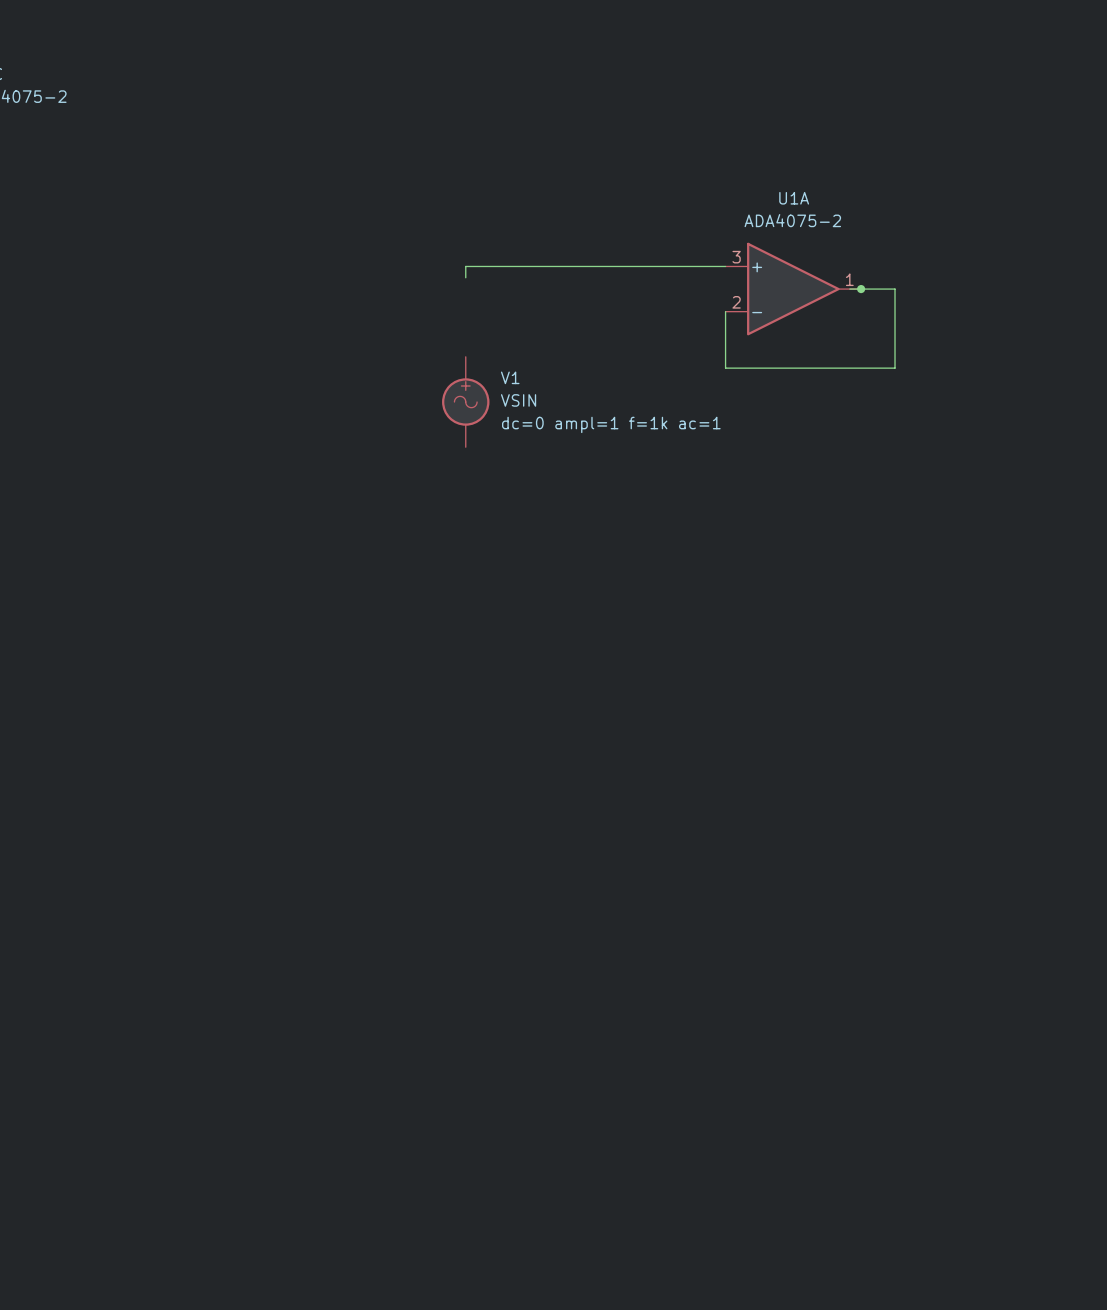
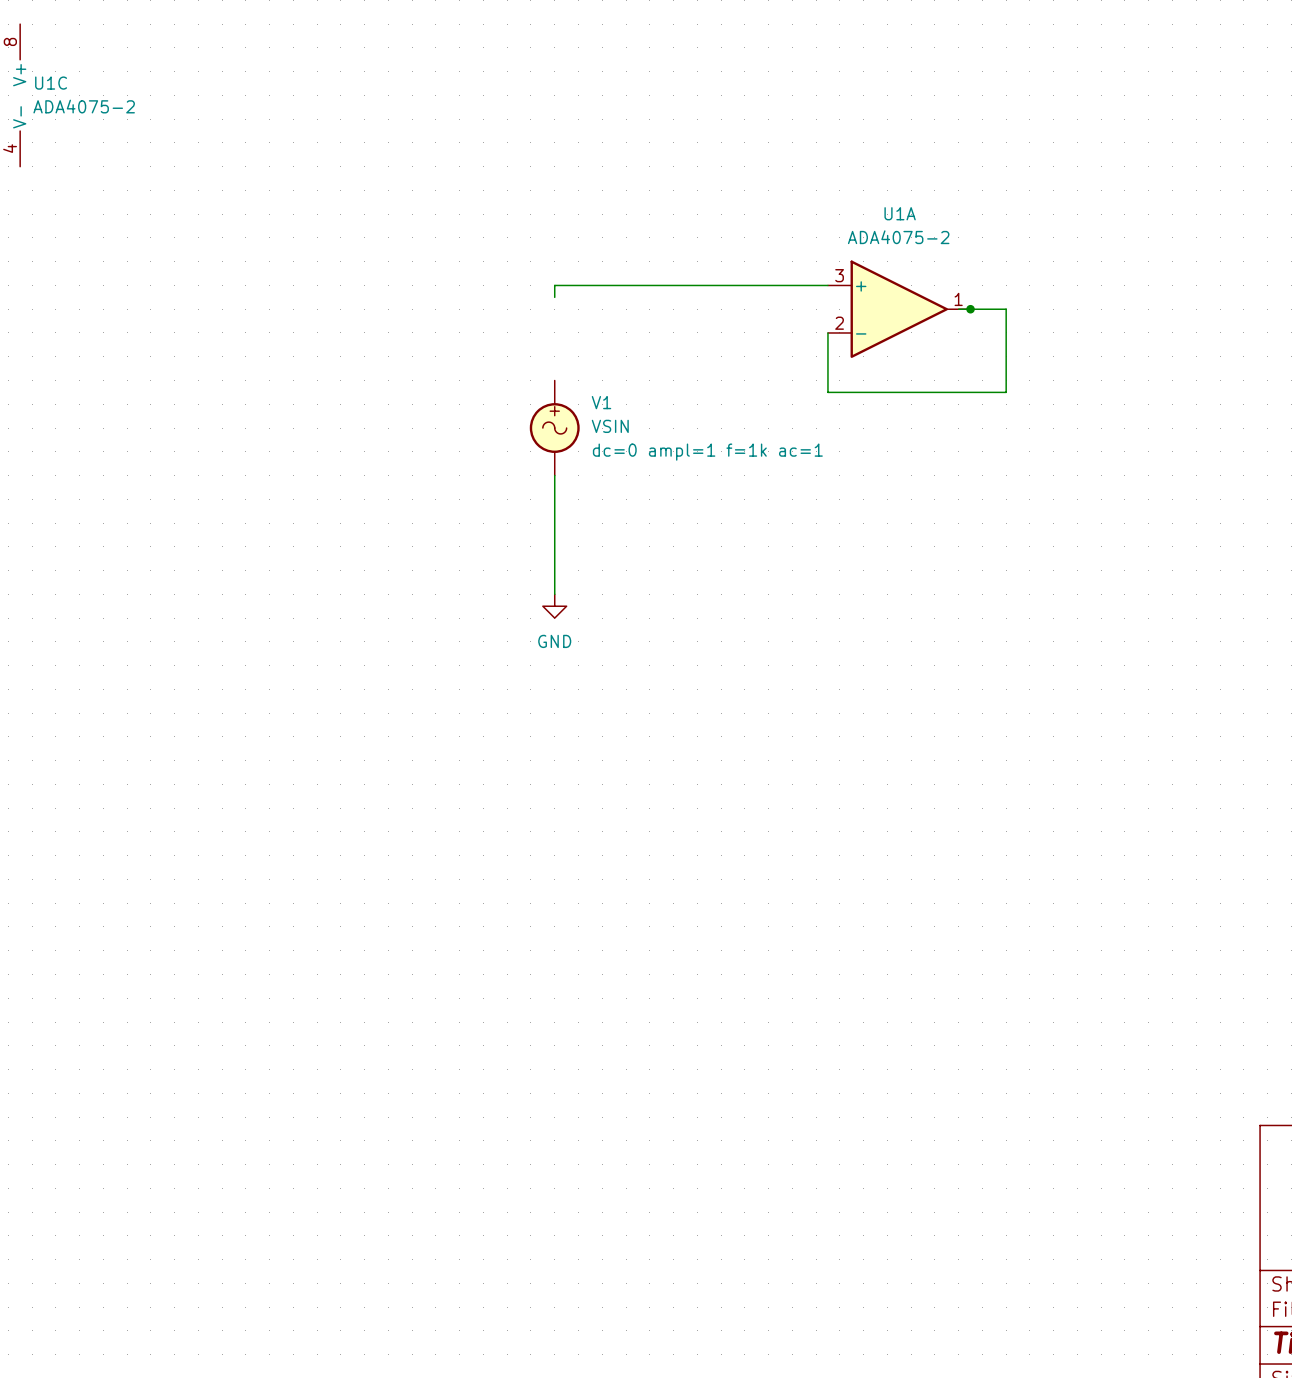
wire: none -> (554, 475) (554, 594)
power symbol: none -> GND (554, 606)

